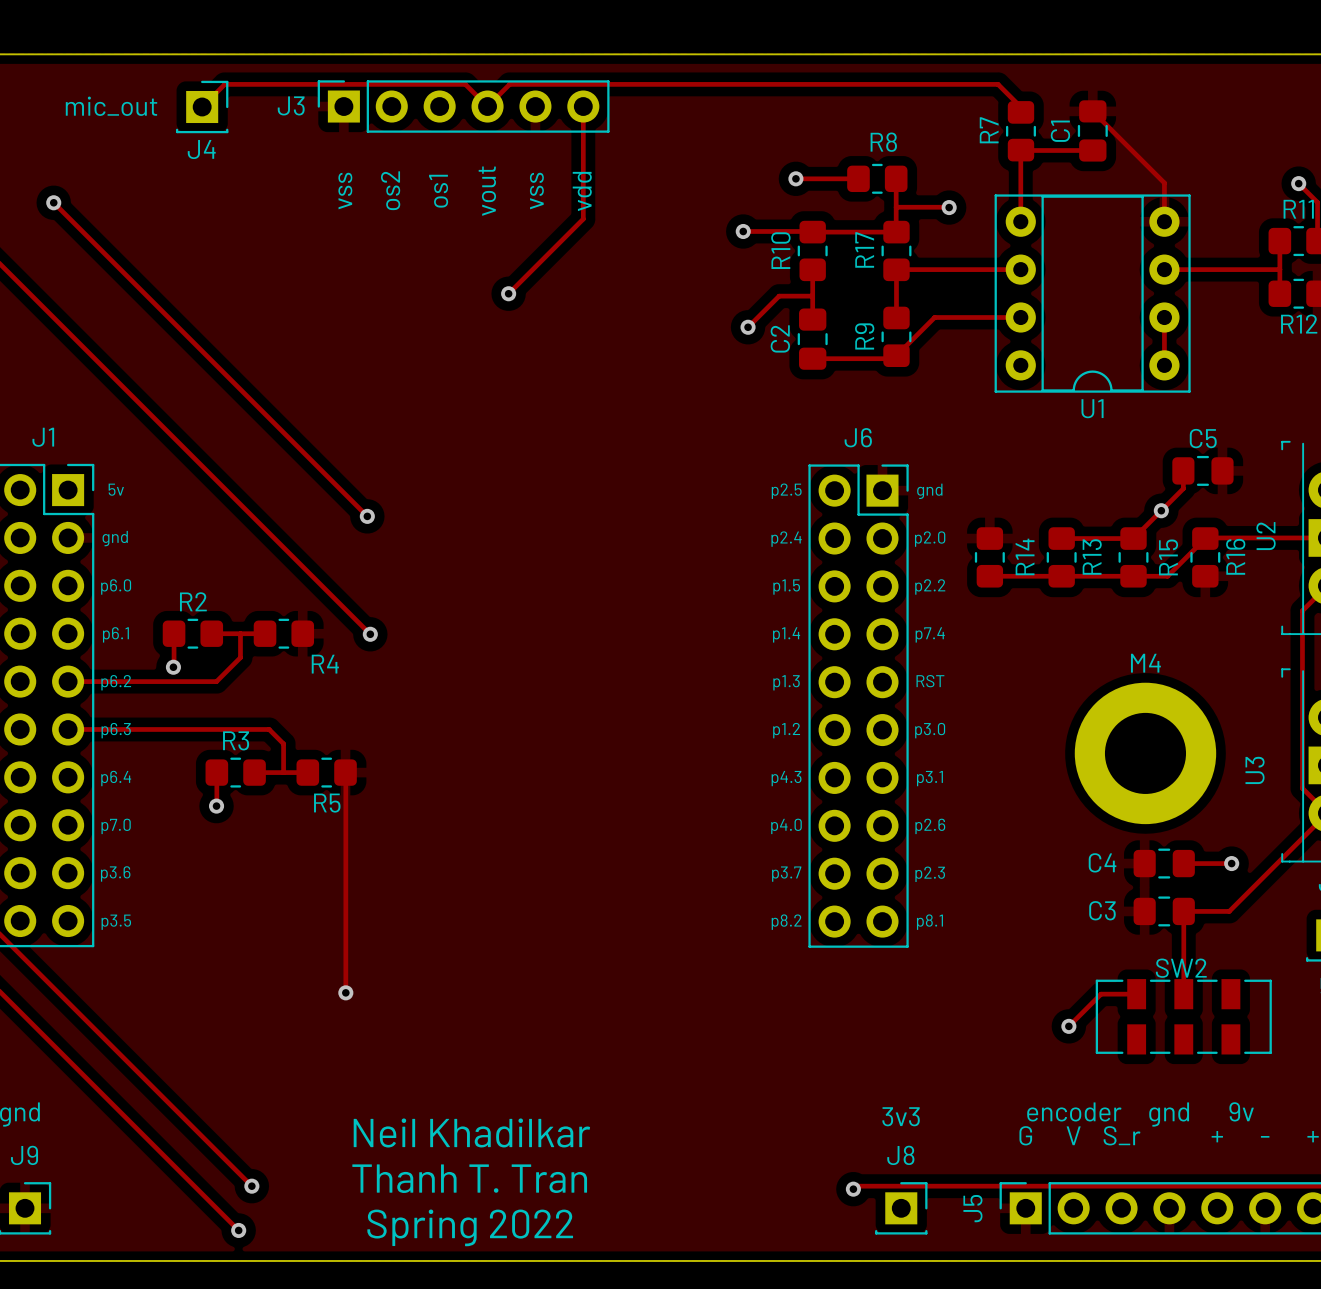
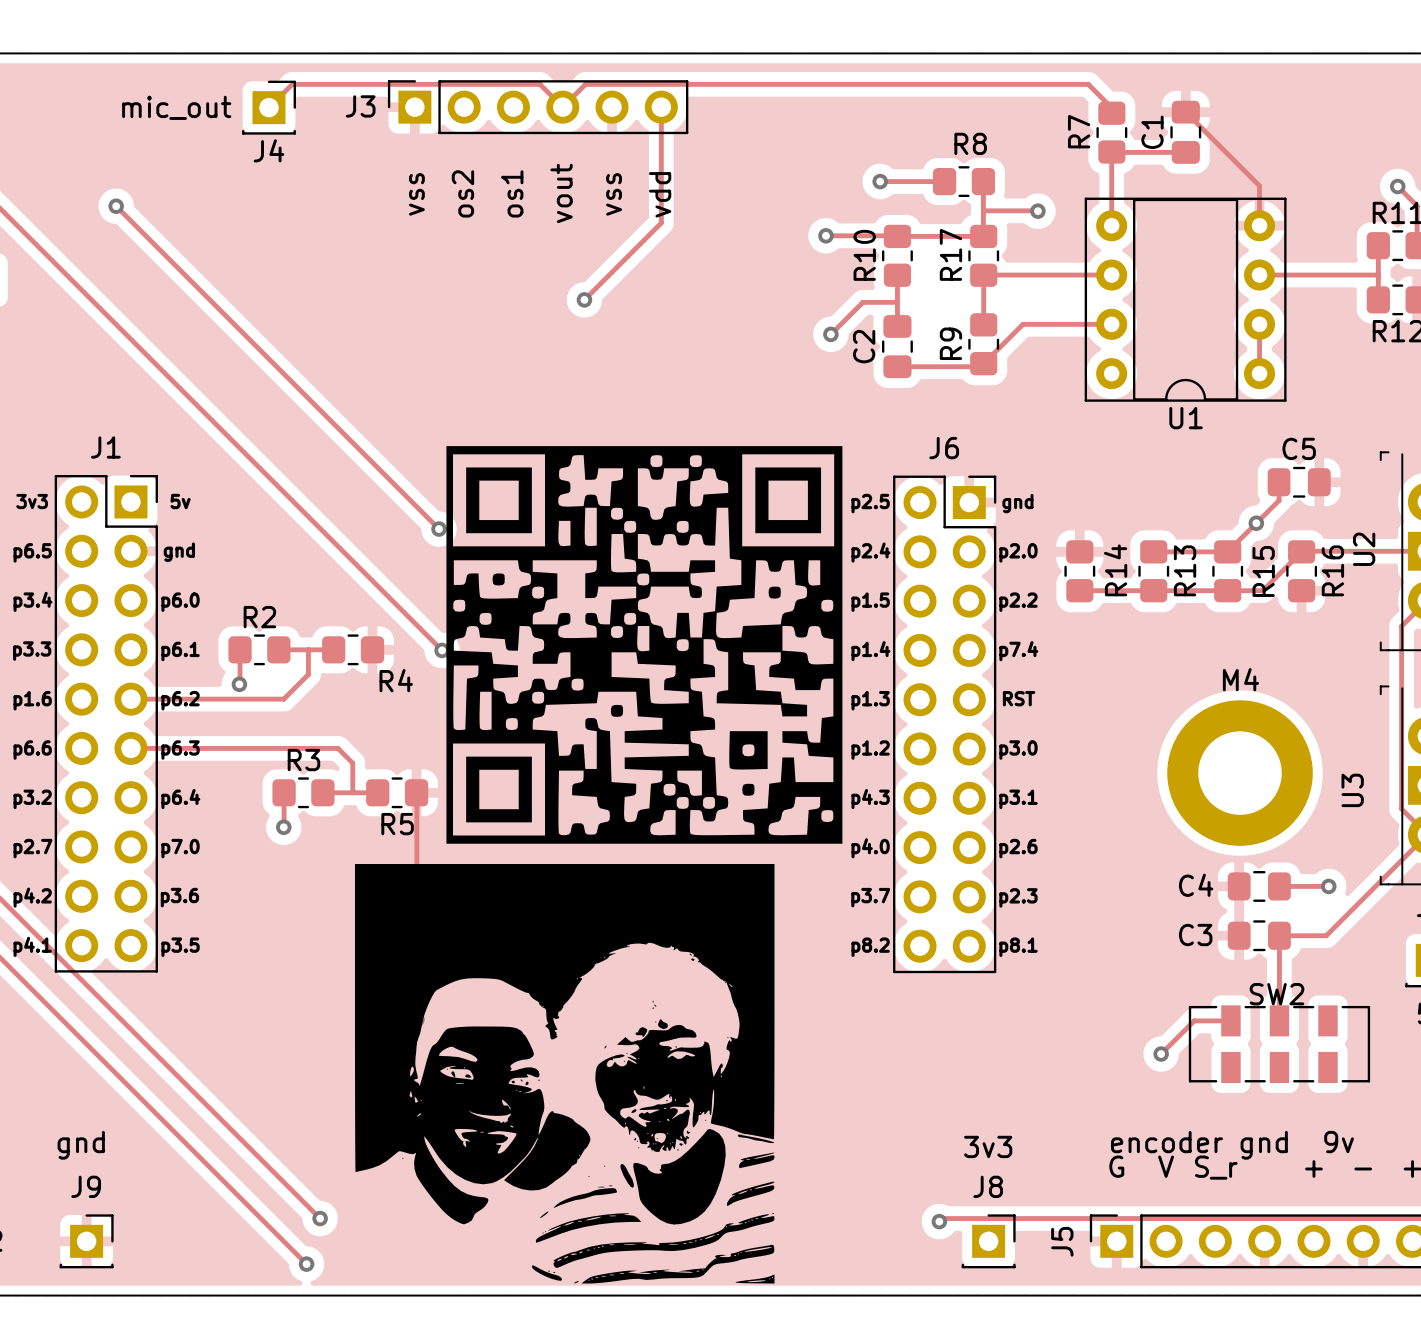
drawing: none -> [354, 446, 843, 1284]
text: Neil Khadilkar (471, 1132) -> none
text: Thanh T. Tran (469, 1178) -> none
text: Spring 2022 (470, 1227) -> none

